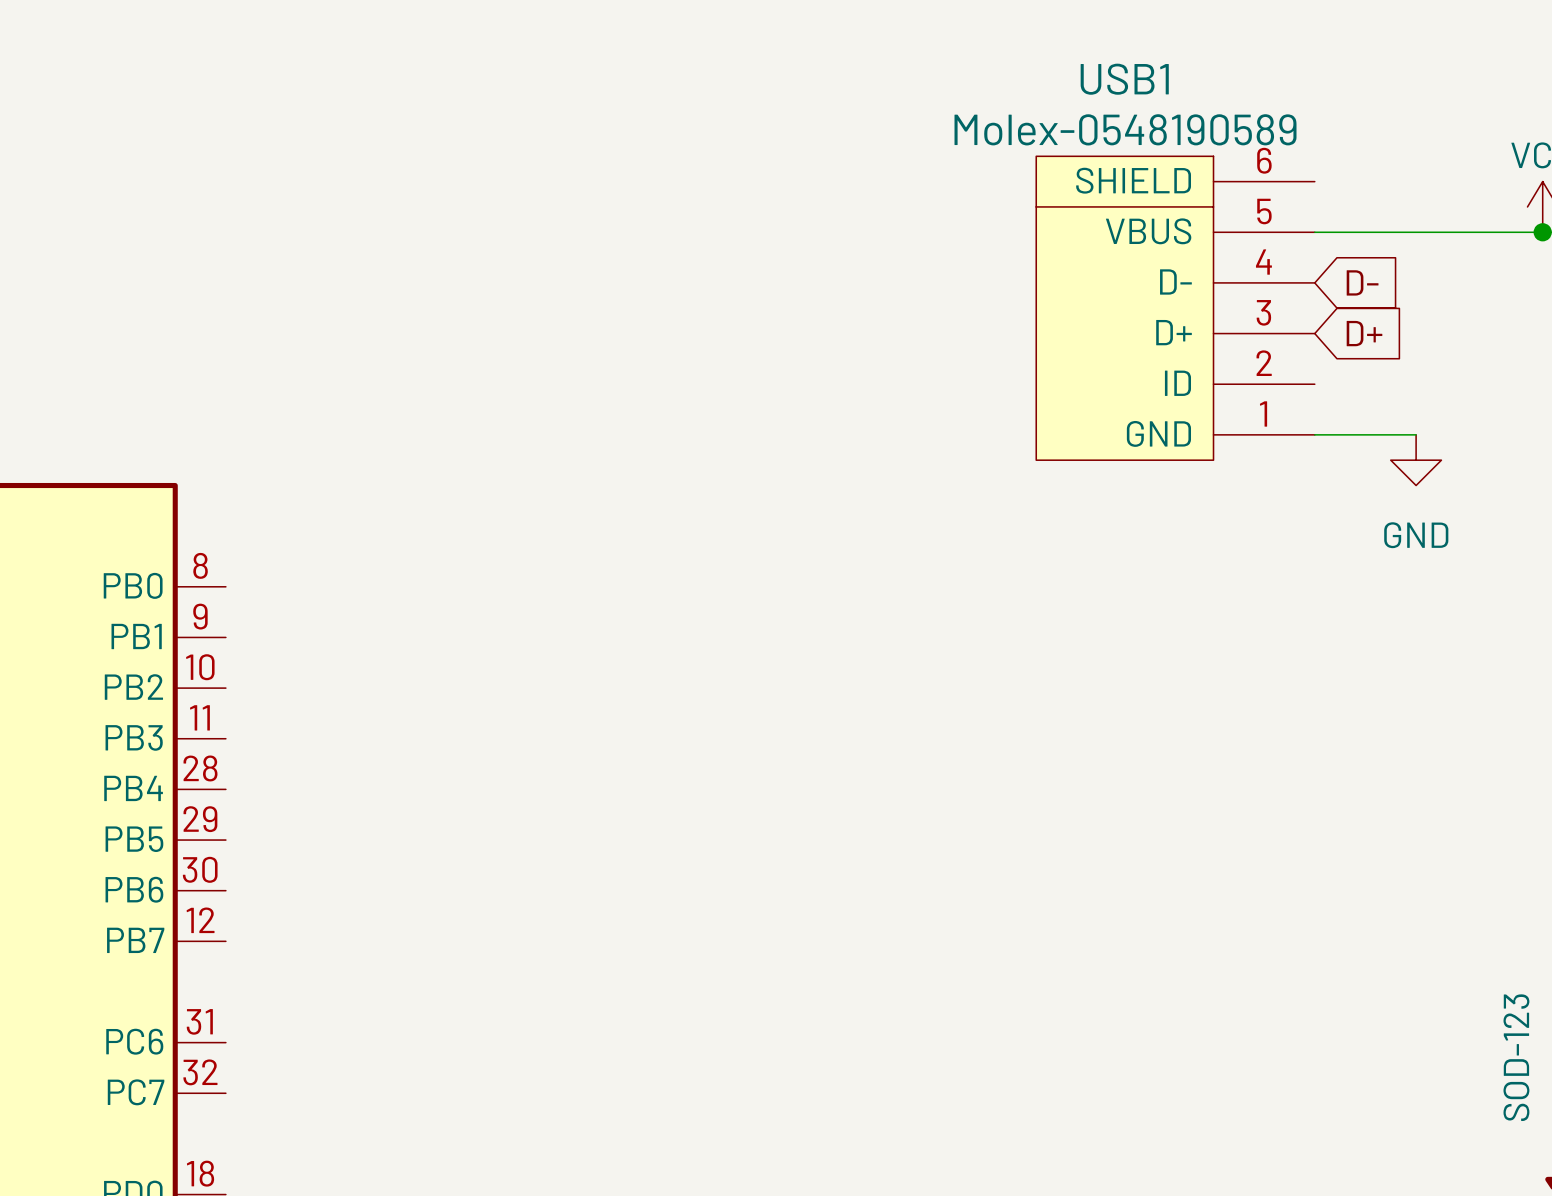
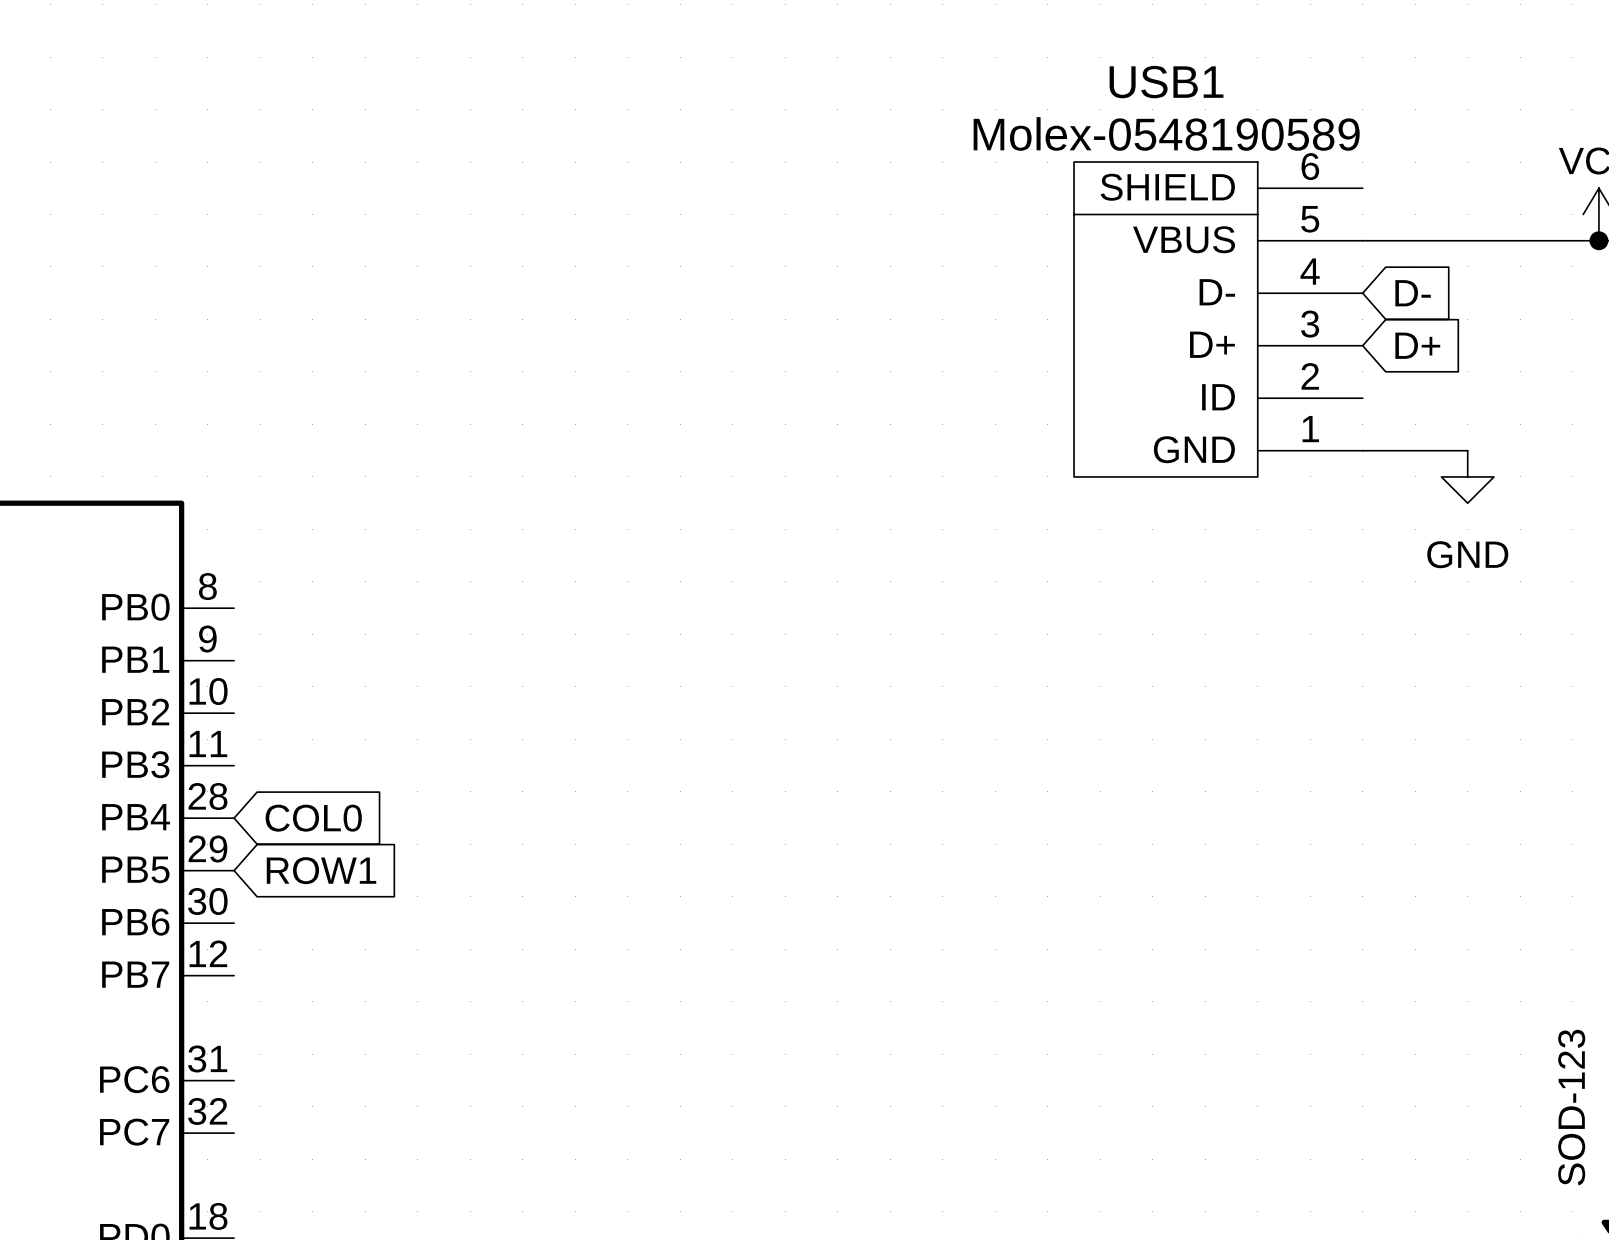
global label: none -> COL0 (313, 818)
global label: none -> ROW1 (321, 870)

